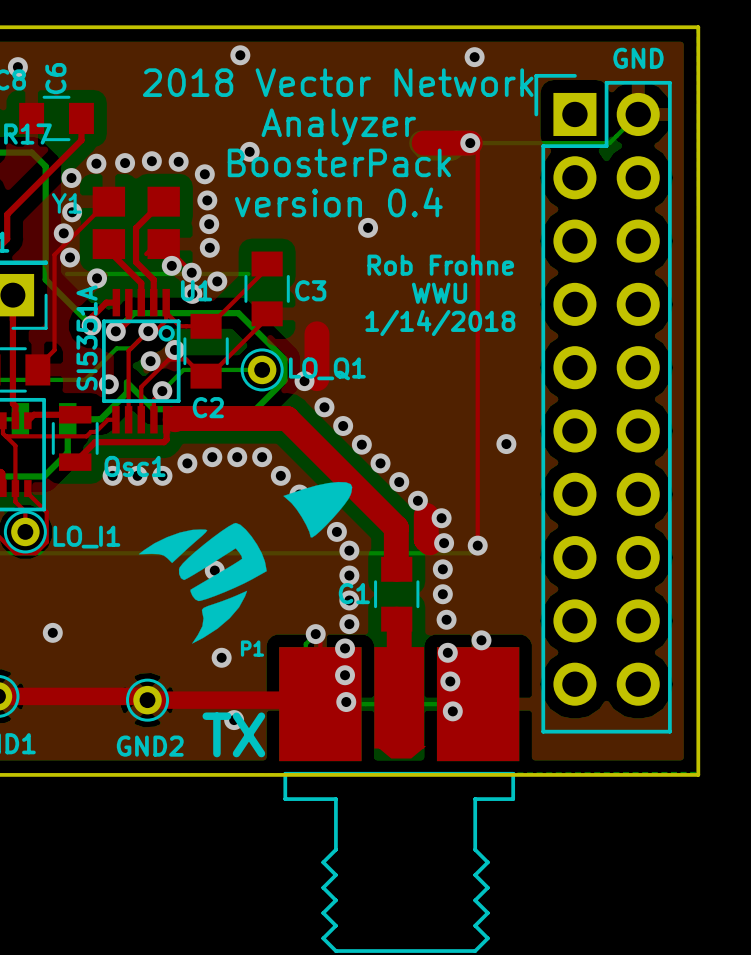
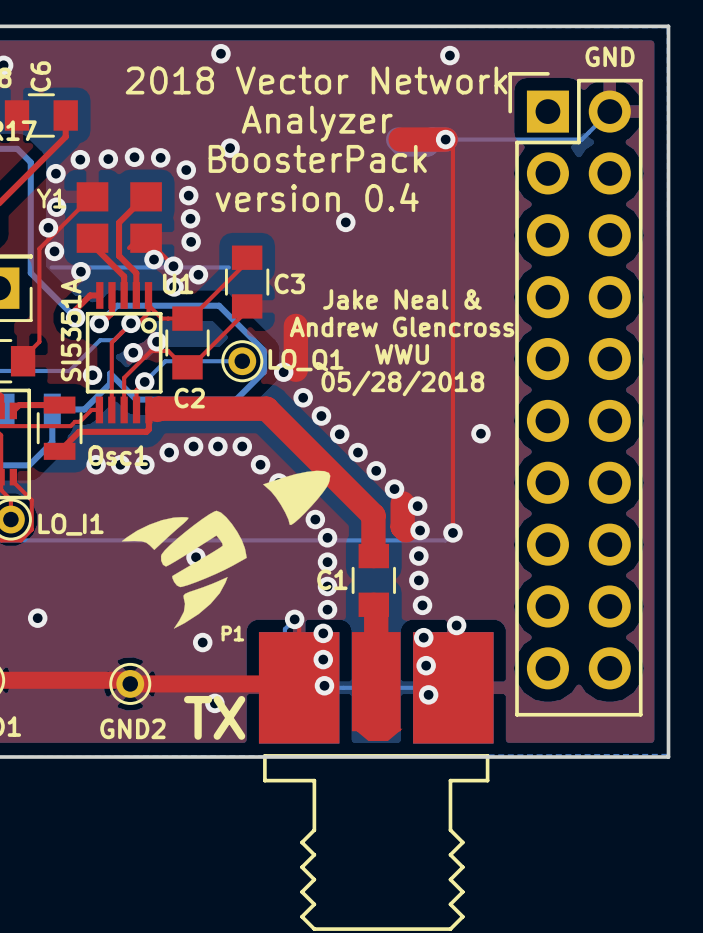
text: Rob Frohne (440, 265) -> none
text position: WWU (439, 293) -> WWU (402, 354)
text: none -> Jake Neal & (402, 299)
text: 1/14/2018 (440, 323) -> none
text: none -> Andrew Glencross (402, 326)
text: none -> 05/28/2018 (402, 383)

